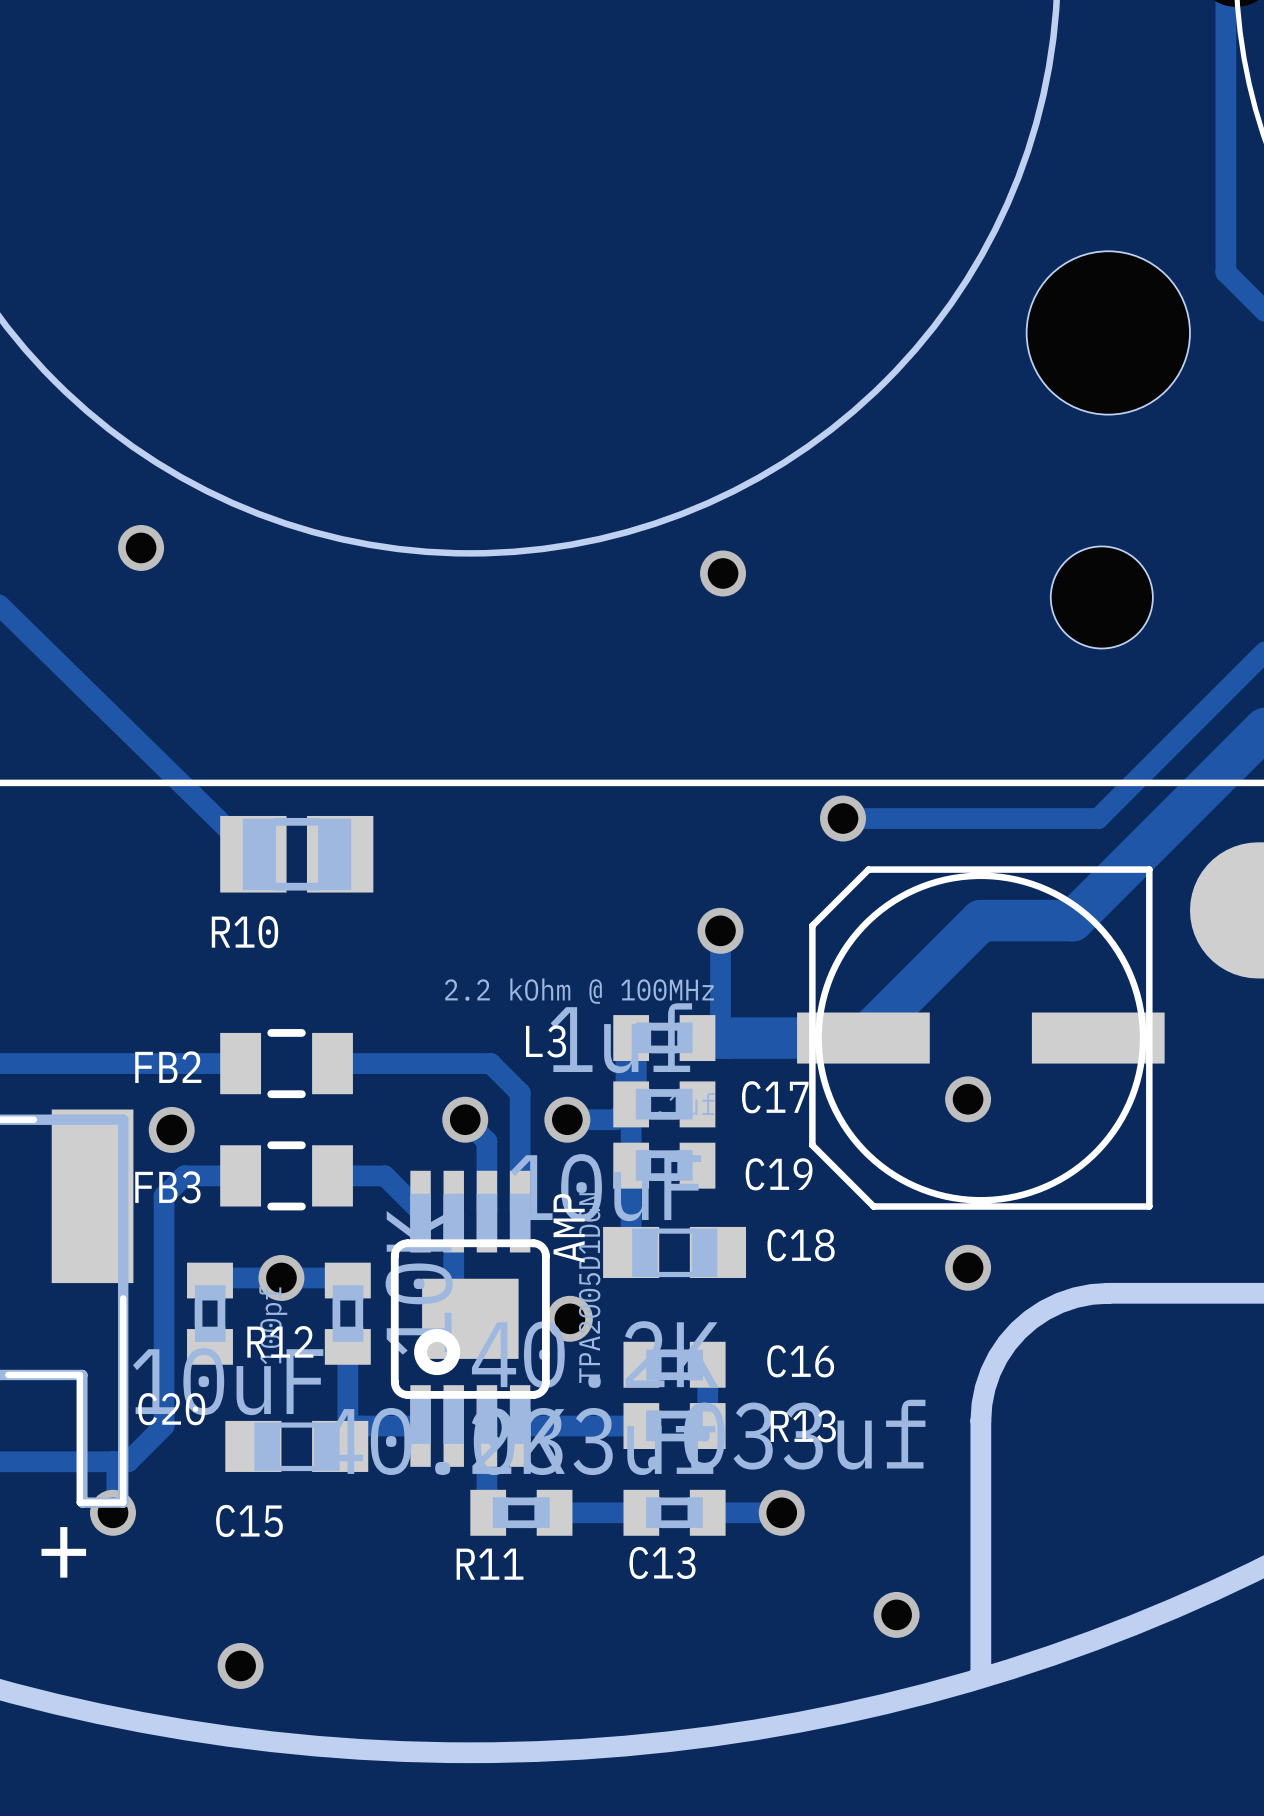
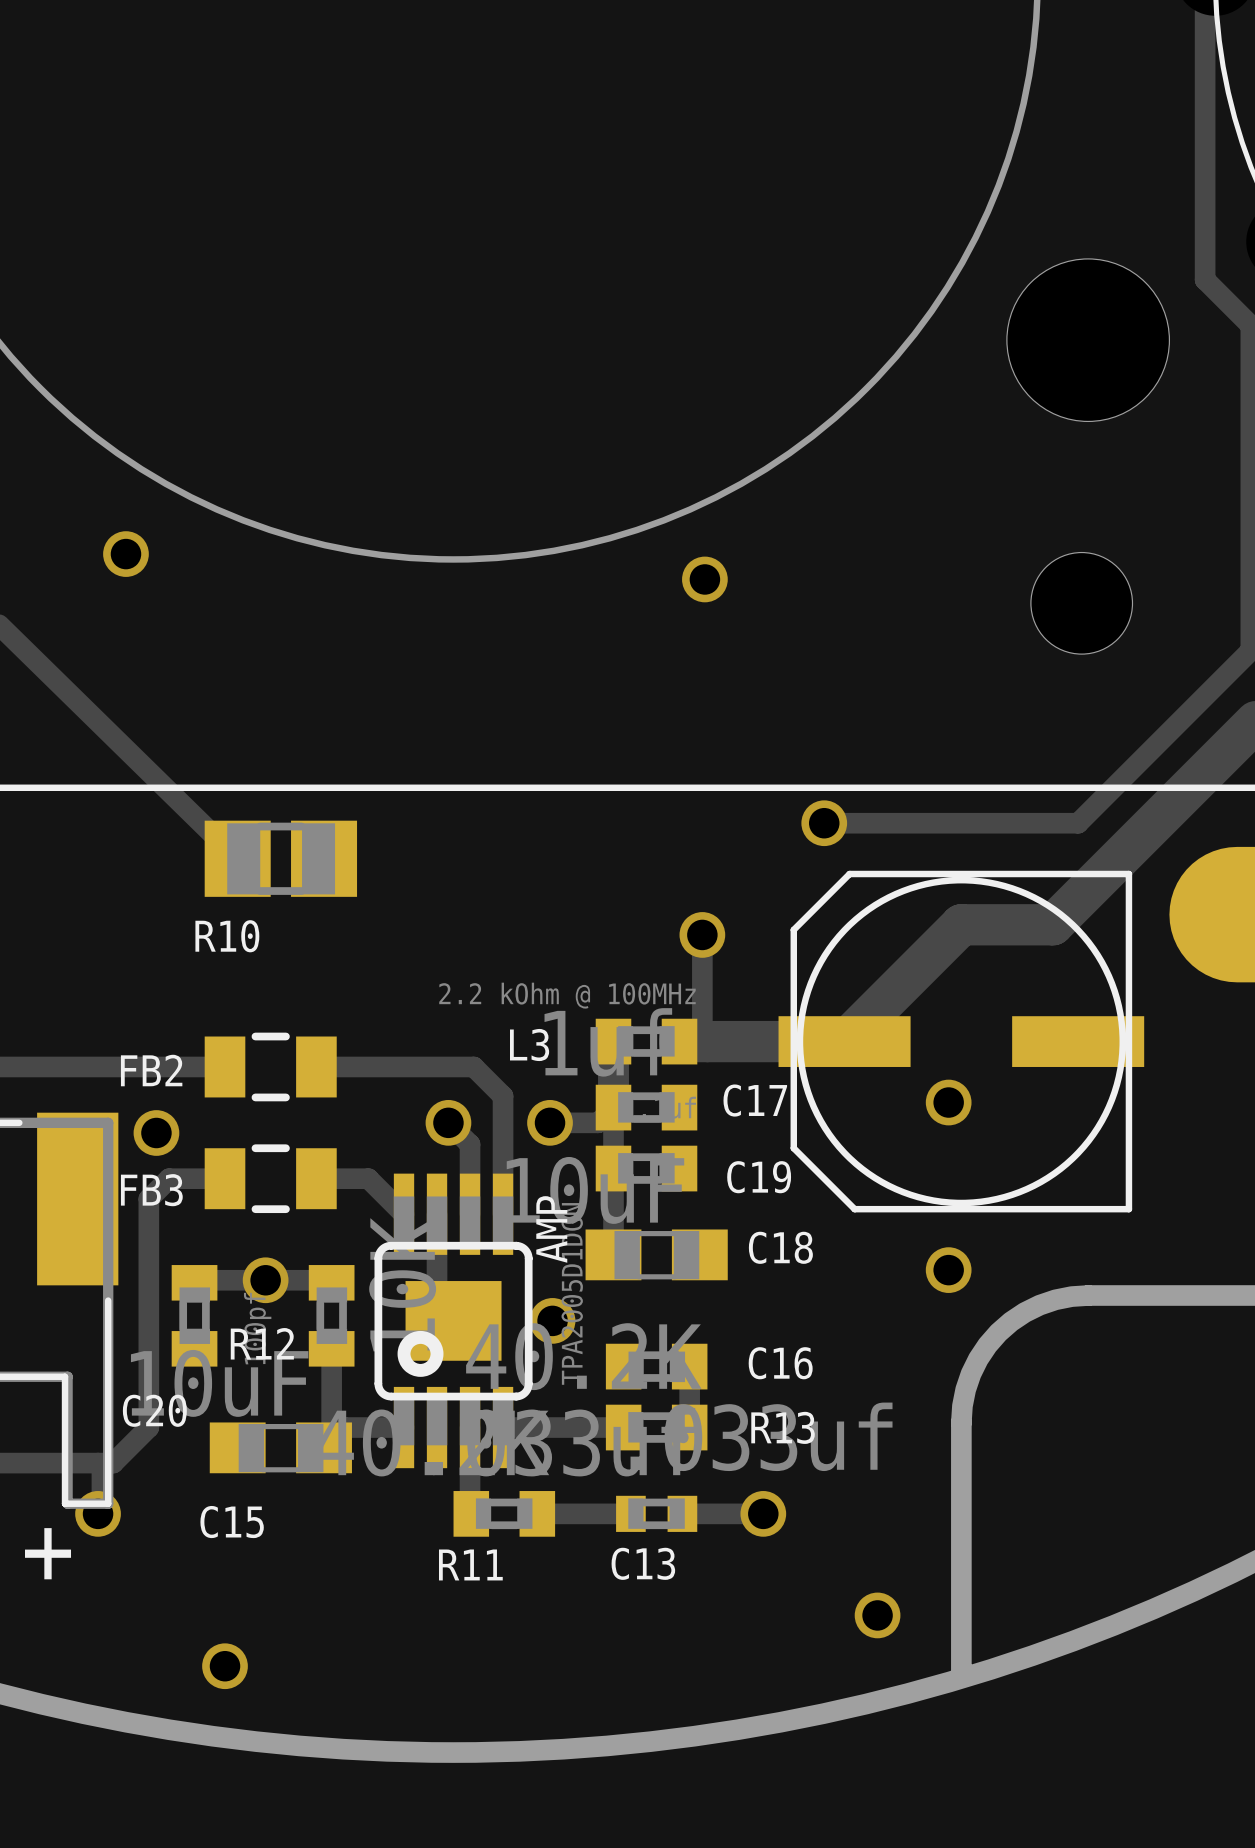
C13 footprint: [623, 1489, 726, 1536] -> [616, 1495, 698, 1532]

